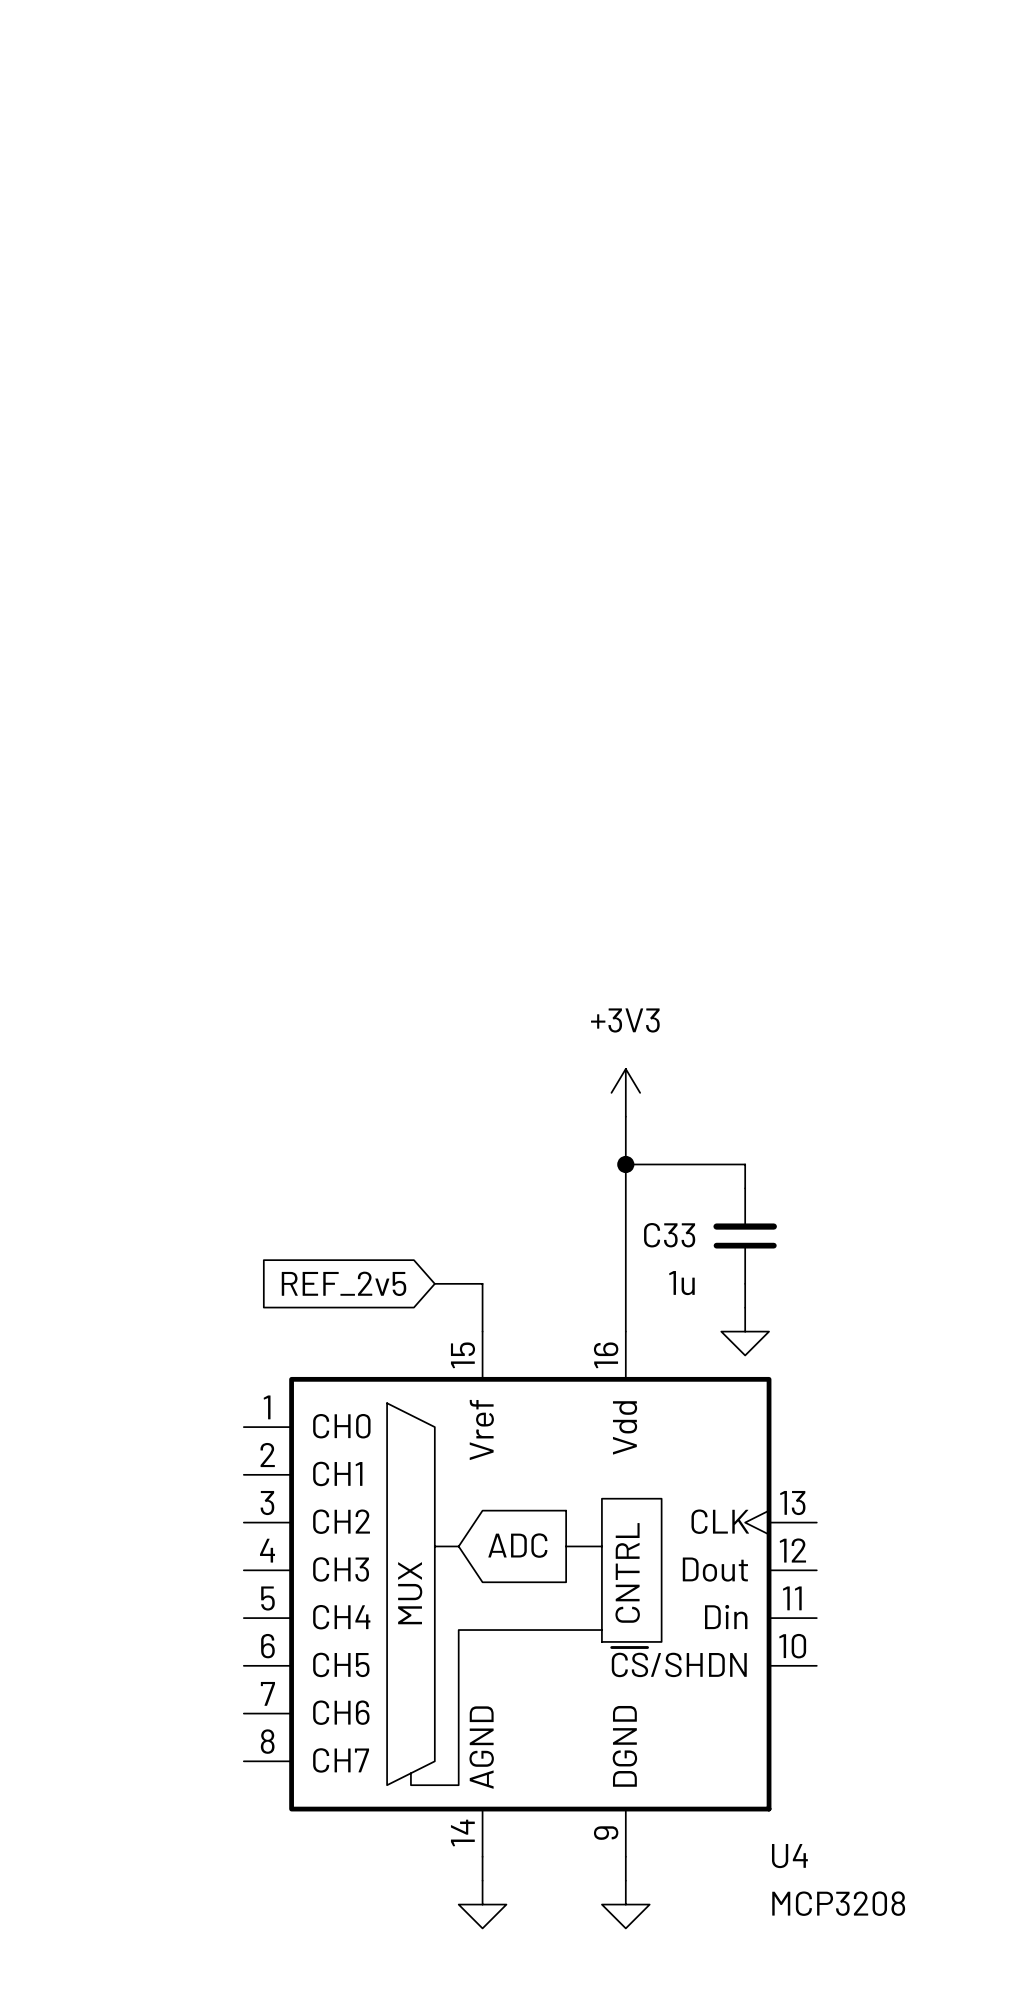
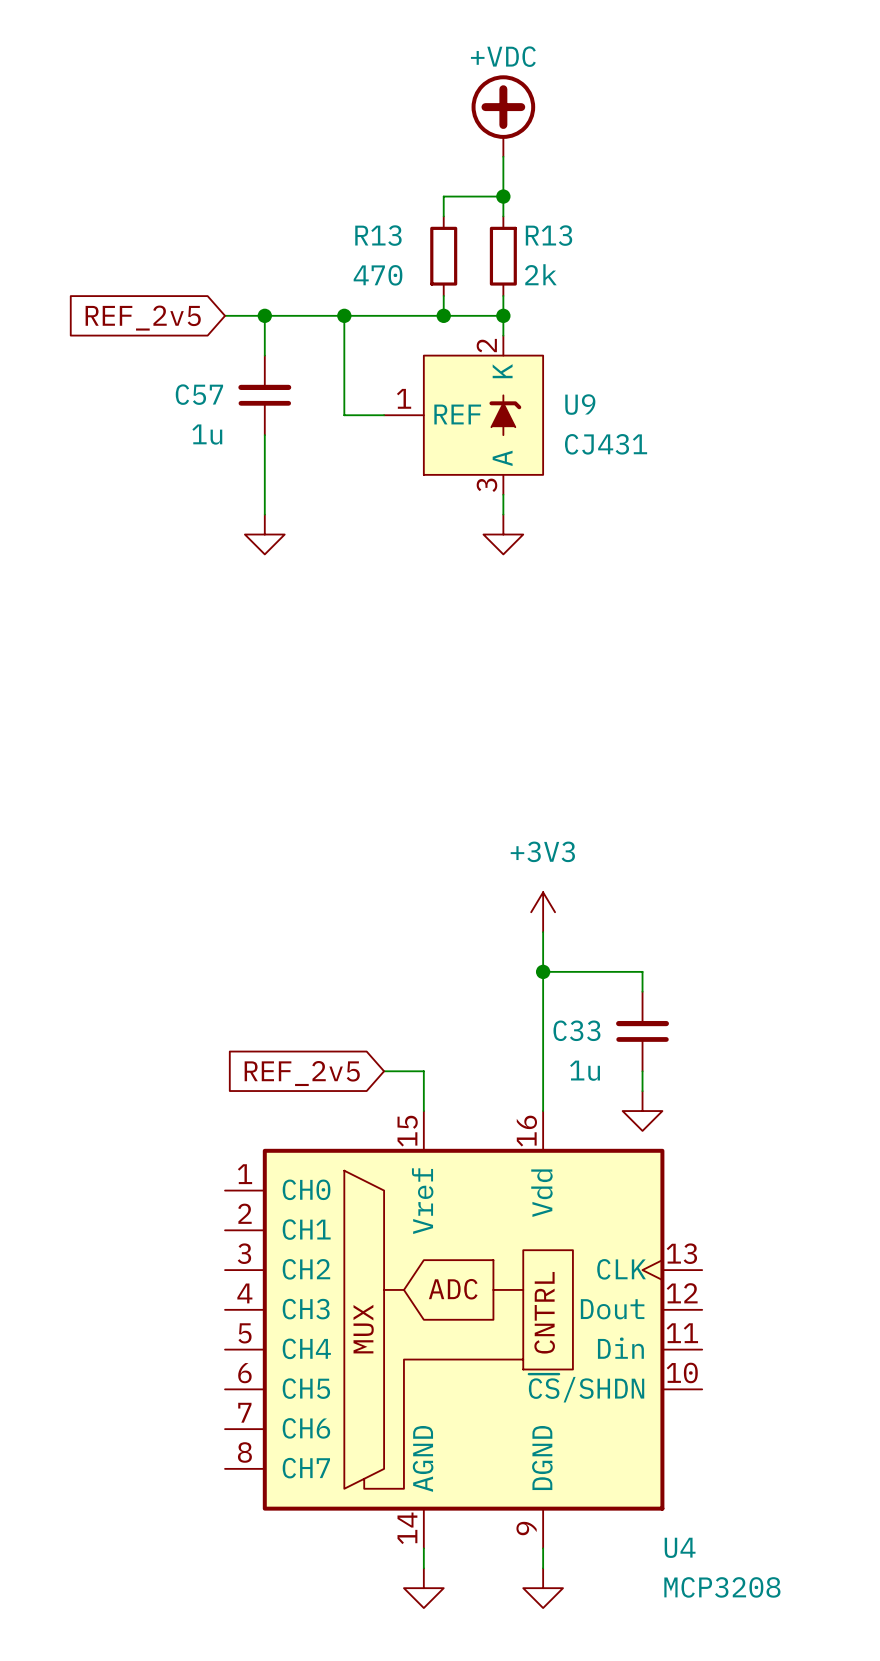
power symbol: none -> +VDC (503, 116)
wire: none -> (503, 156) (503, 216)
wire: none -> (503, 196) (443, 196) (443, 216)
junction: none -> (503, 196)
R13: none -> 470 (443, 256)
R13: none -> 2k (503, 256)
wire: none -> (443, 295) (443, 315)
wire: none -> (503, 295) (503, 335)
global label: none -> REF_2v5 (143, 318)
wire: none -> (225, 315) (503, 315)
wire: none -> (264, 315) (264, 355)
junction: none -> (264, 315)
wire: none -> (344, 315) (344, 415) (384, 415)
junction: none -> (344, 315)
junction: none -> (443, 315)
junction: none -> (503, 315)
C57: none -> 1u (264, 395)
U9: none -> CJ431 (463, 415)
wire: none -> (264, 435) (264, 514)
wire: none -> (503, 494) (503, 514)
power symbol: none -> (264, 534)
power symbol: none -> (503, 534)

